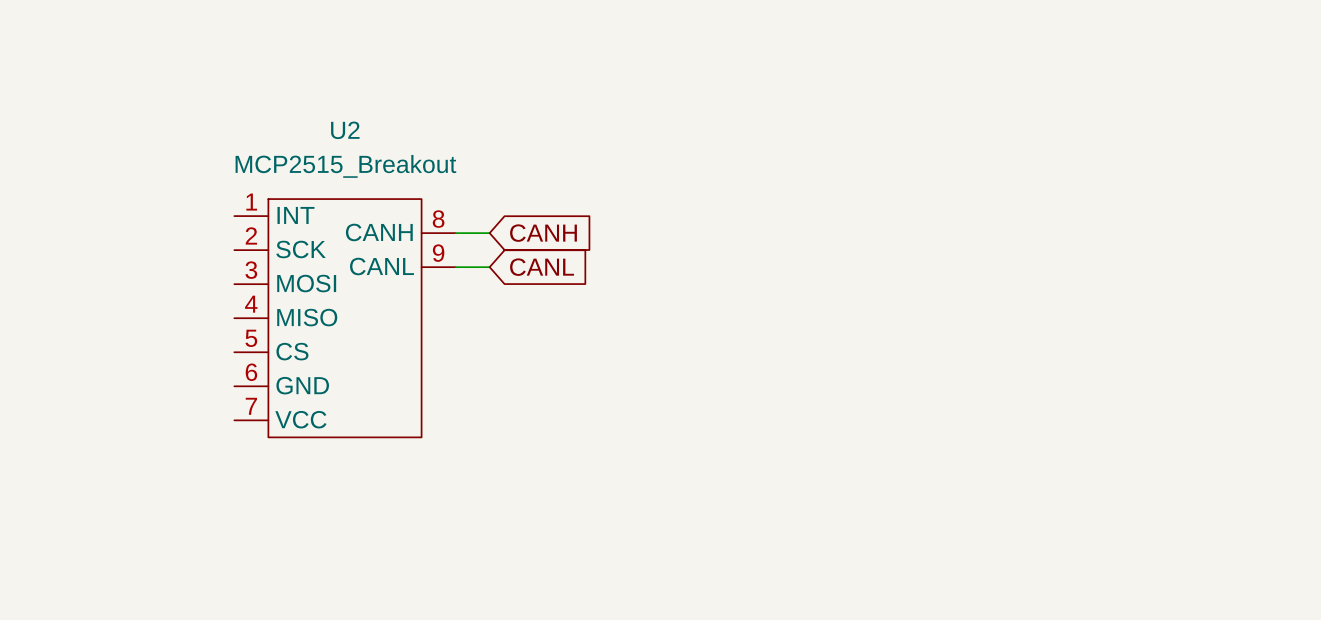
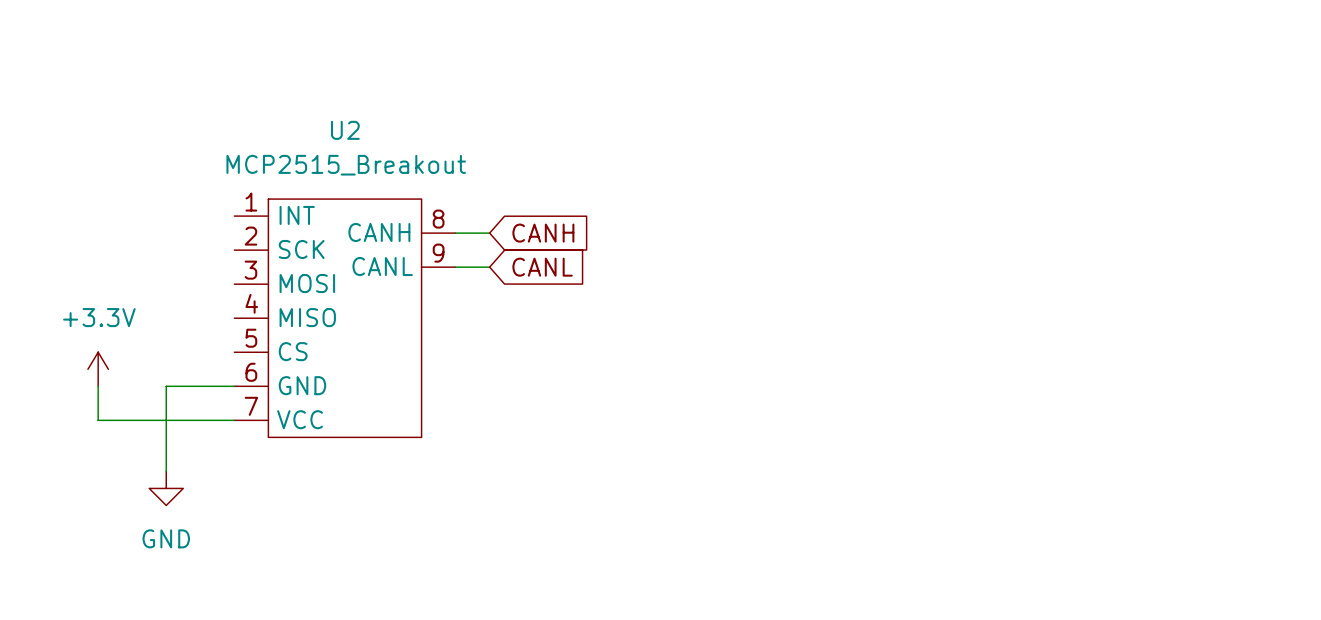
power symbol: none -> +3.3V (98, 369)
wire: none -> (98, 386) (98, 420) (234, 420)
wire: none -> (234, 386) (166, 386) (166, 471)
power symbol: none -> GND (166, 488)

